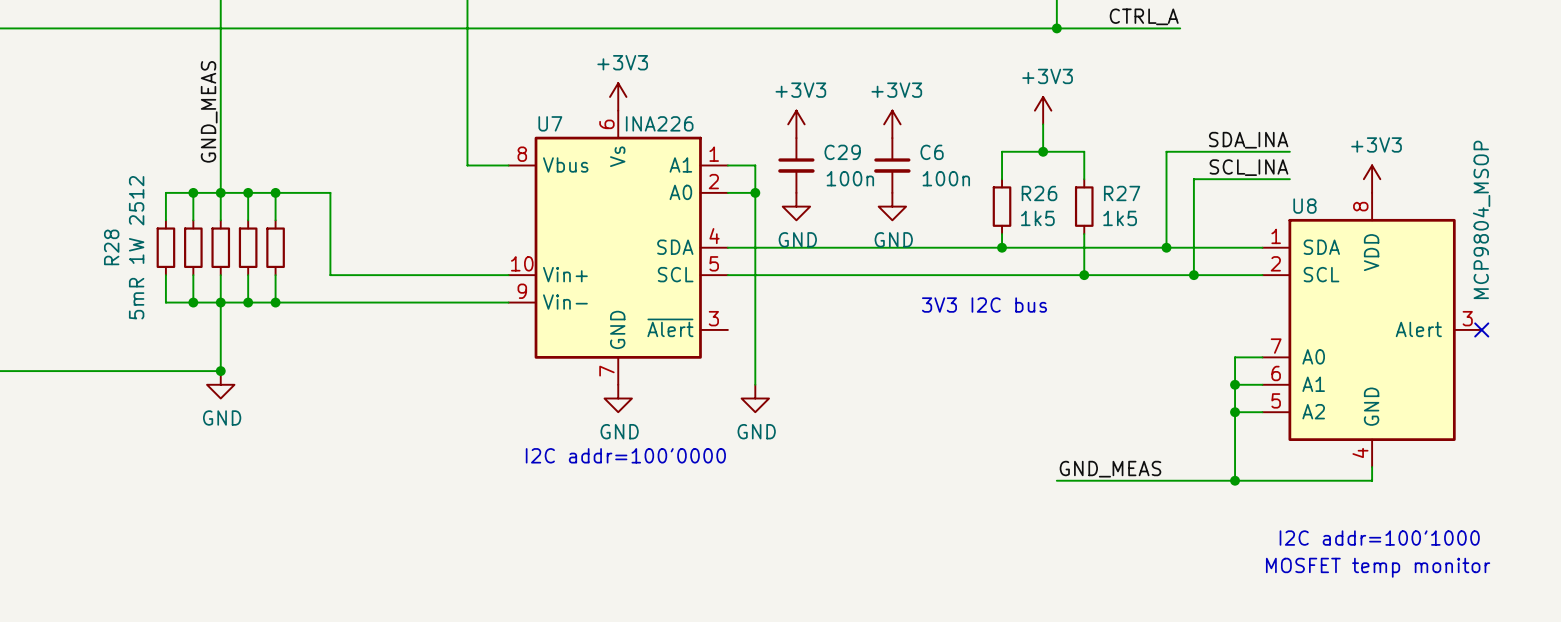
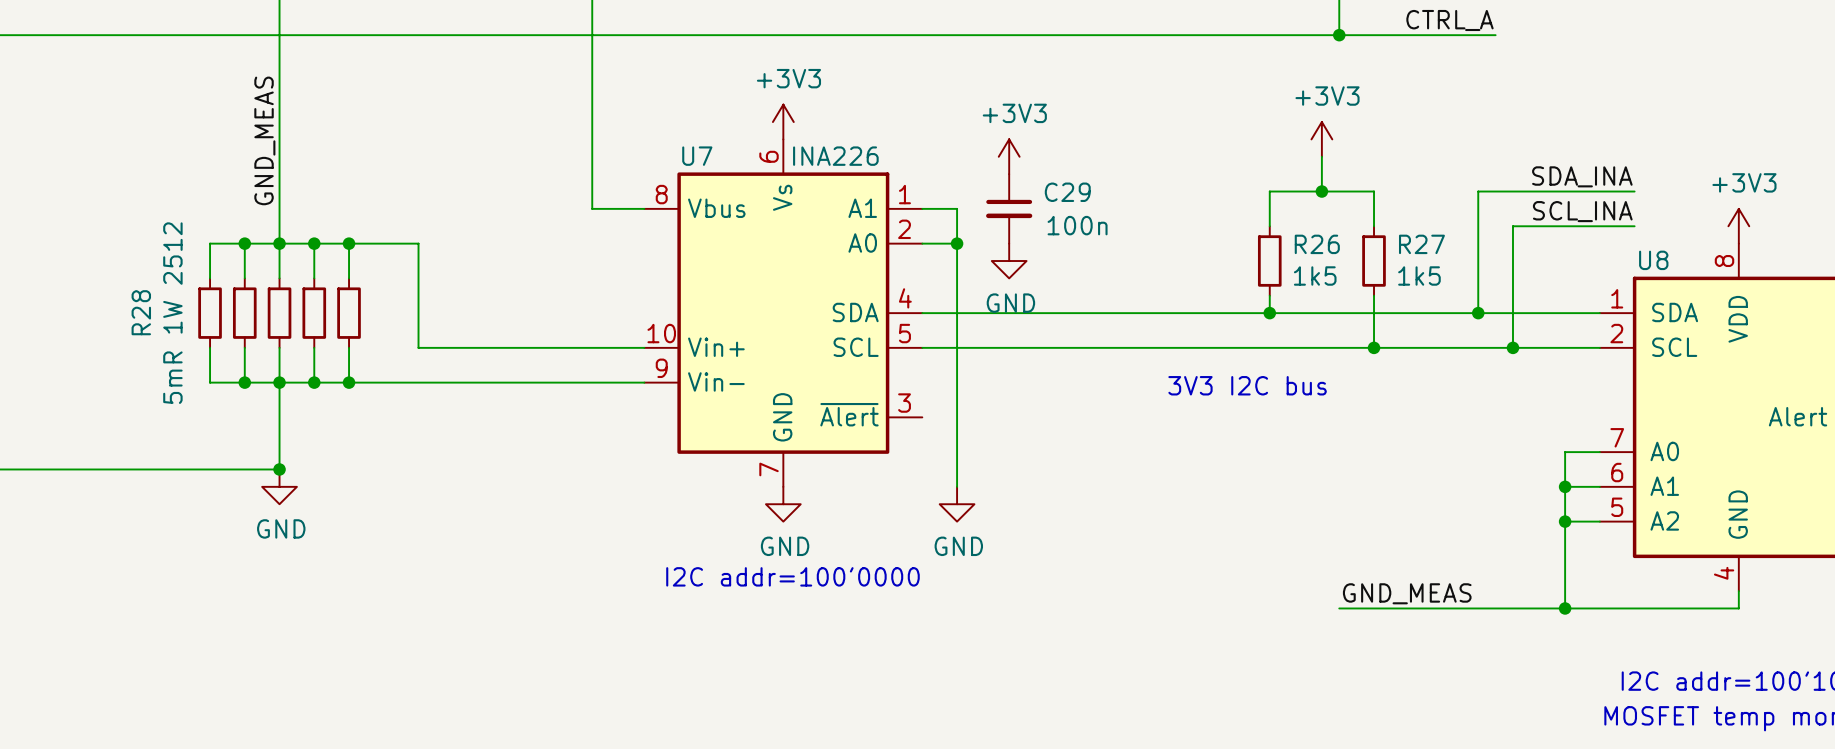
power symbol: +3V3 (892, 124) -> none
C6: 100n (892, 165) -> none
power symbol: GND (892, 206) -> none

